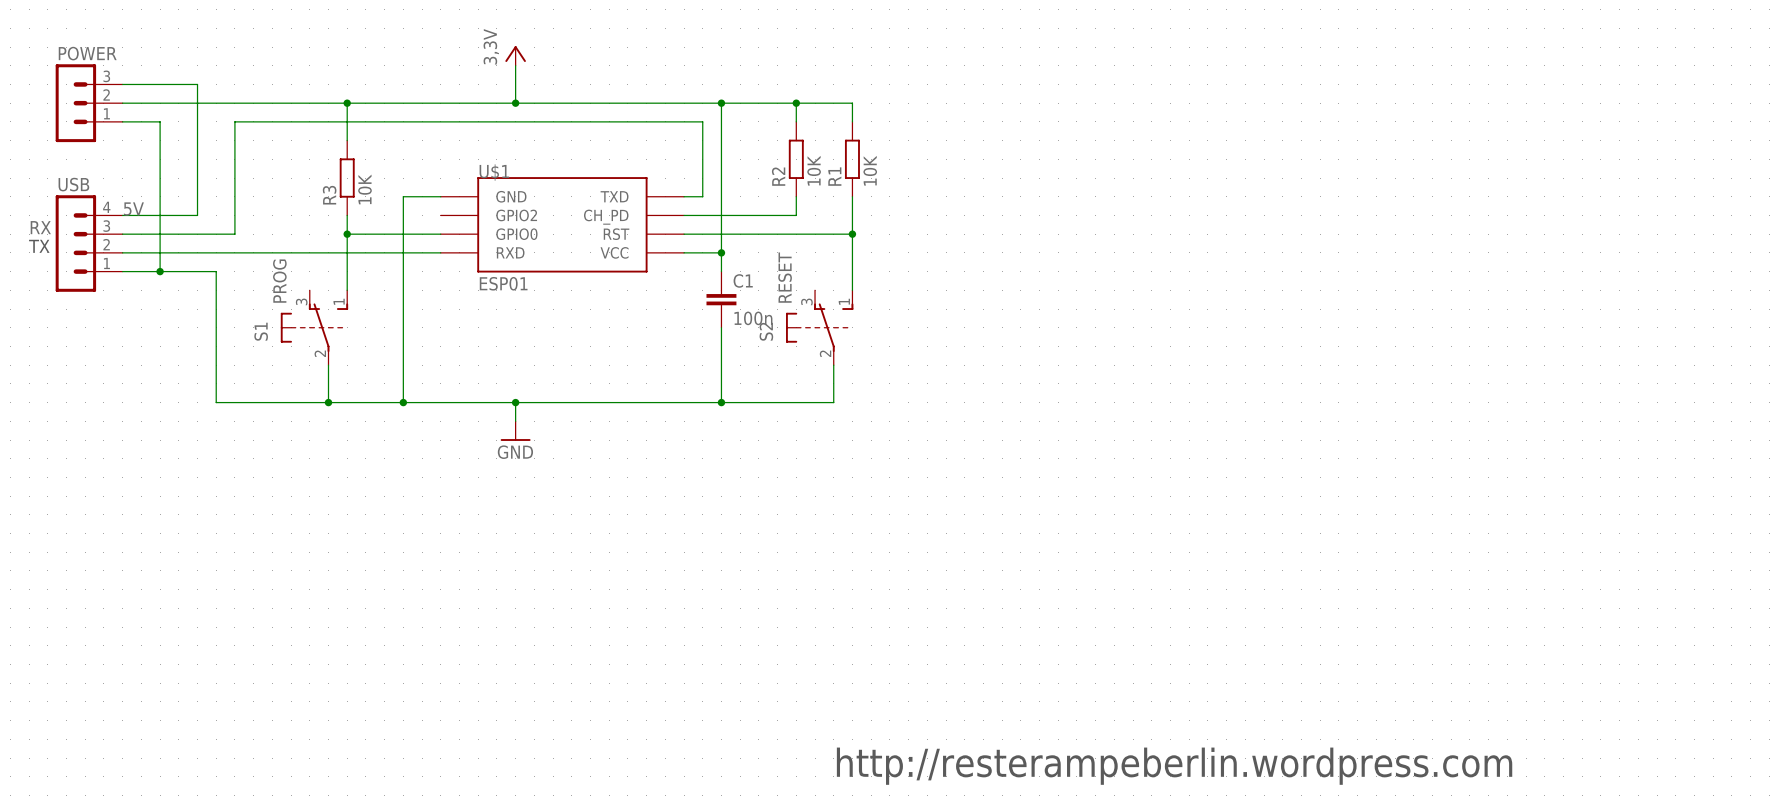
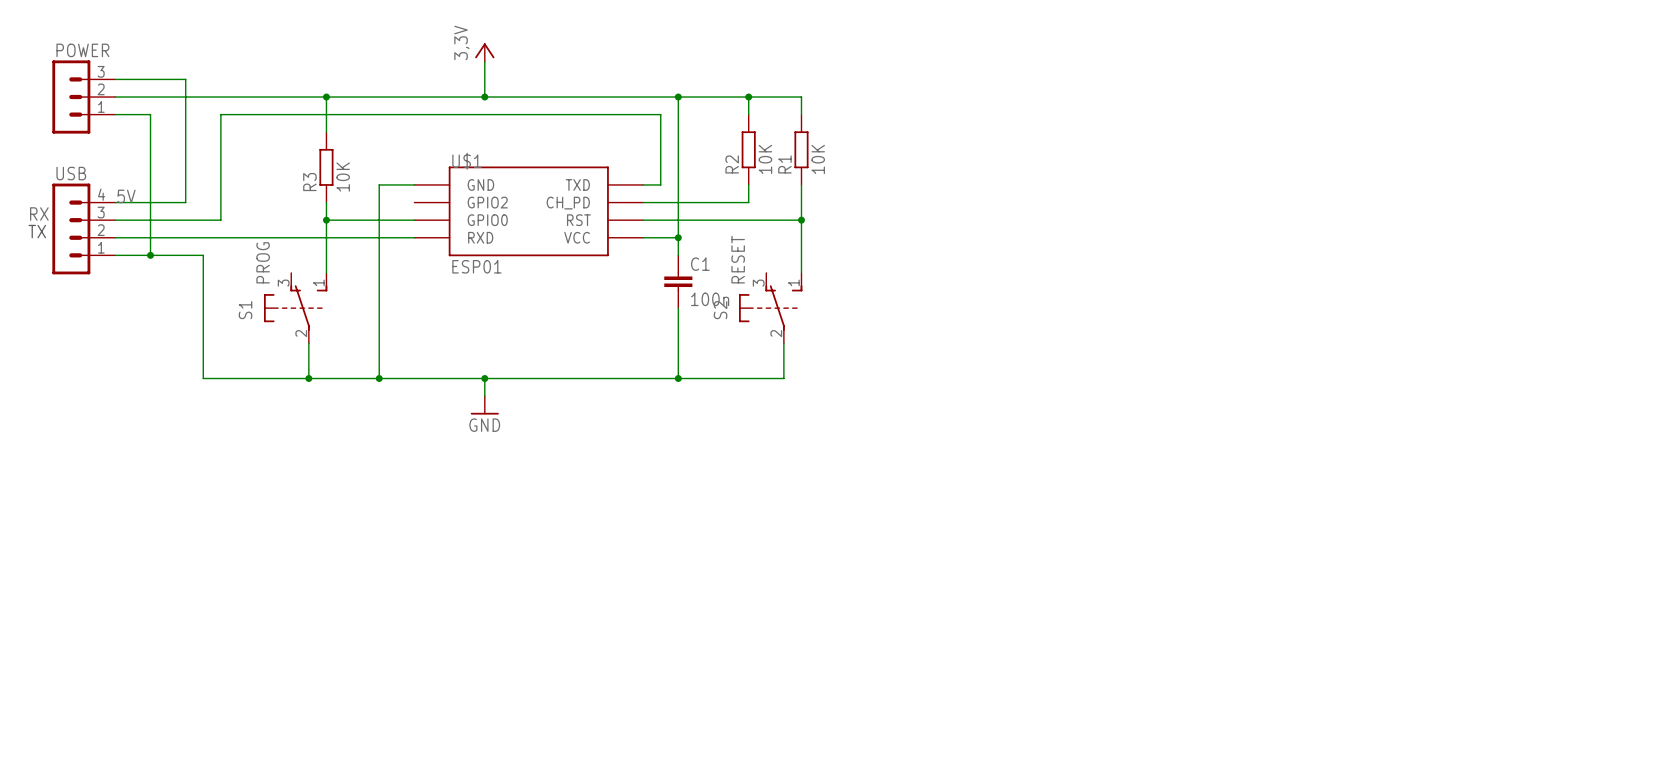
text: http://resterampeberlin.wordpress.com (1174, 766) -> none

